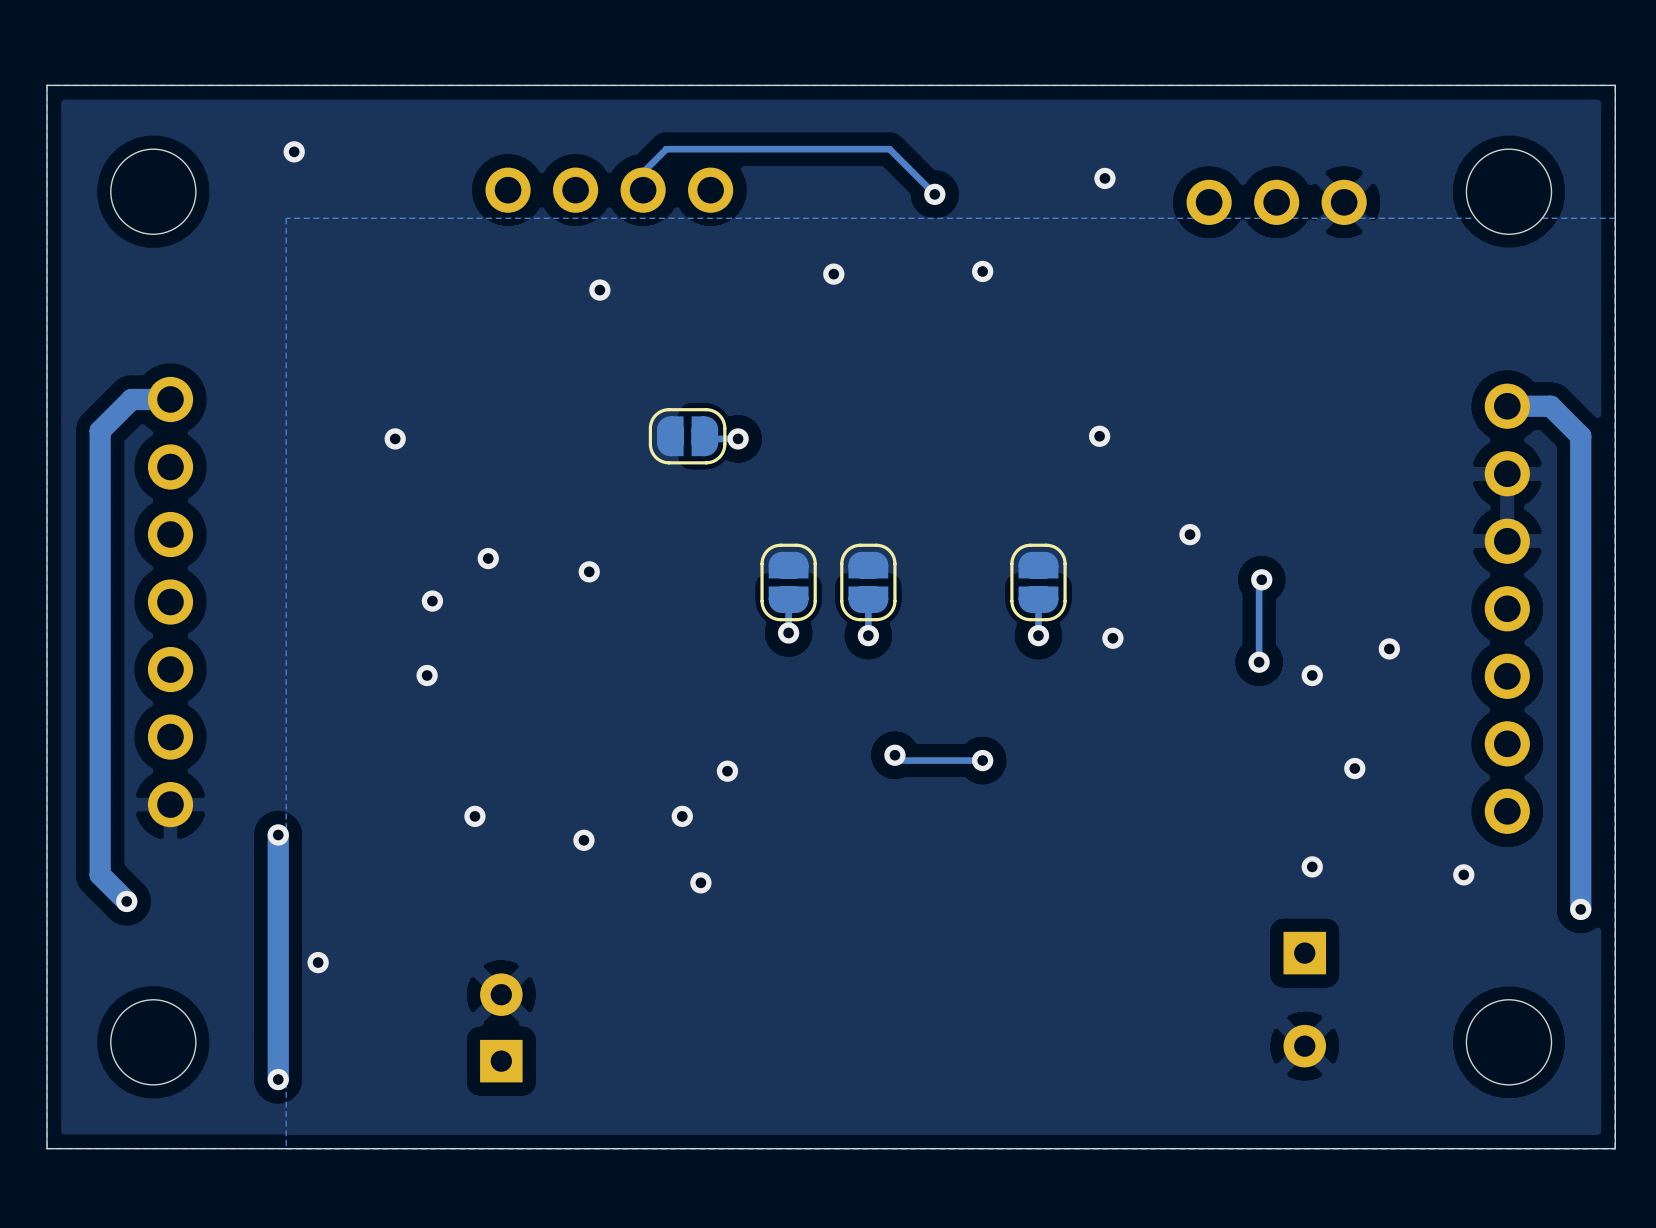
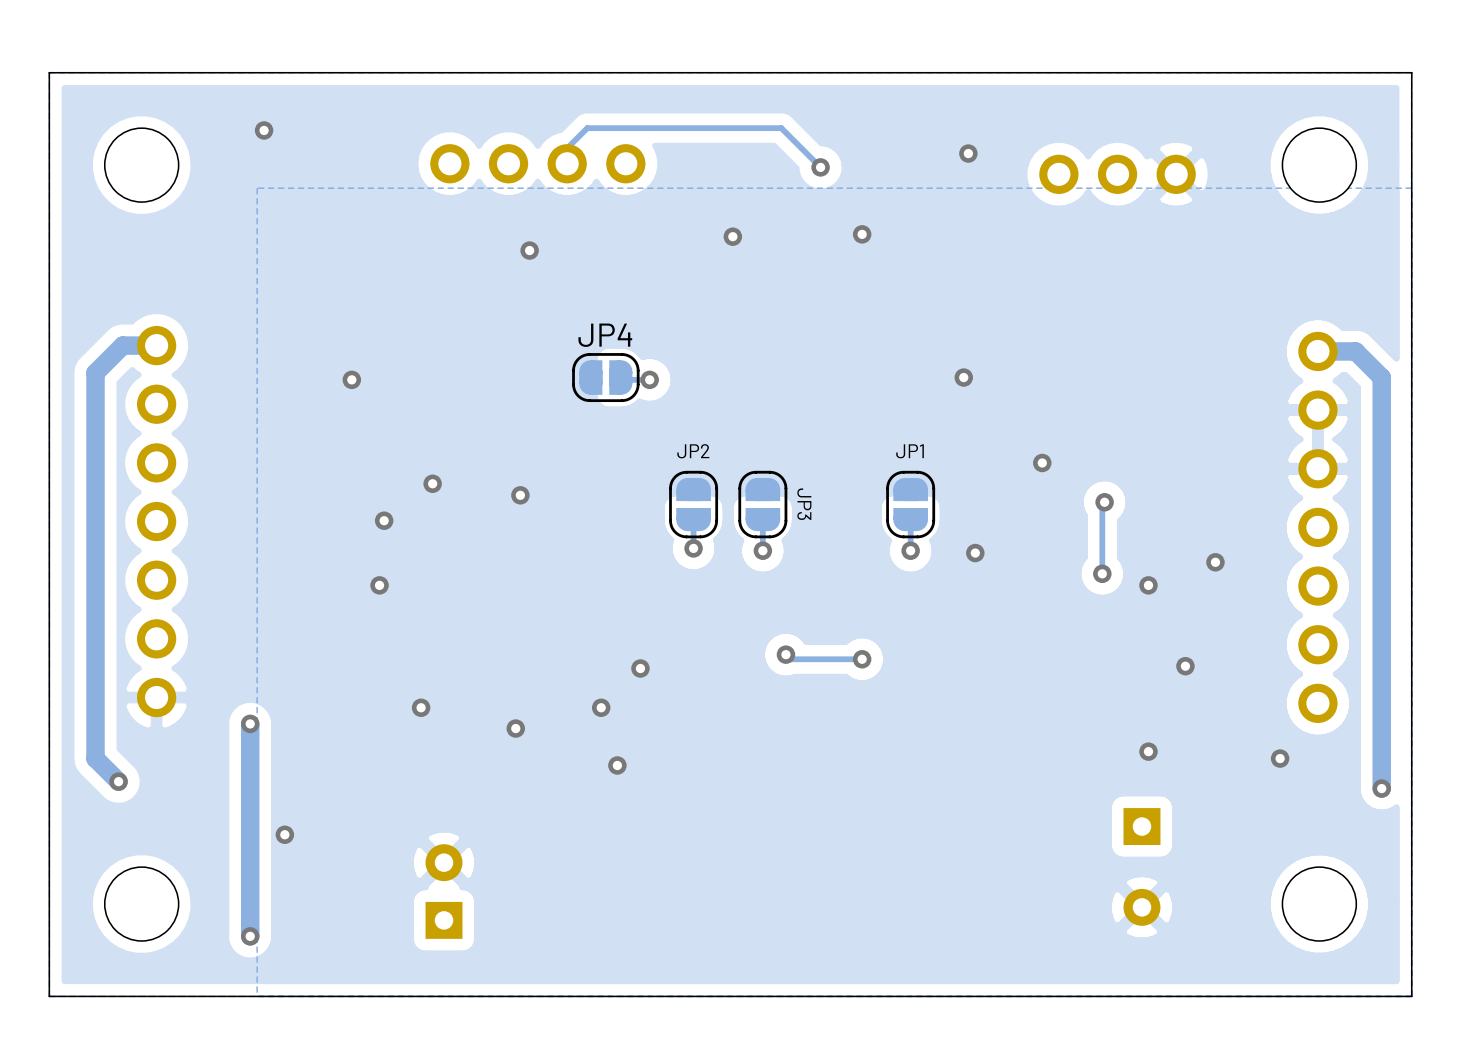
JP4 name: none -> JP4 (605, 335)
JP2 name: none -> JP2 (693, 451)
JP1 name: none -> JP1 (910, 451)
JP3 name: none -> JP3 (804, 504)

